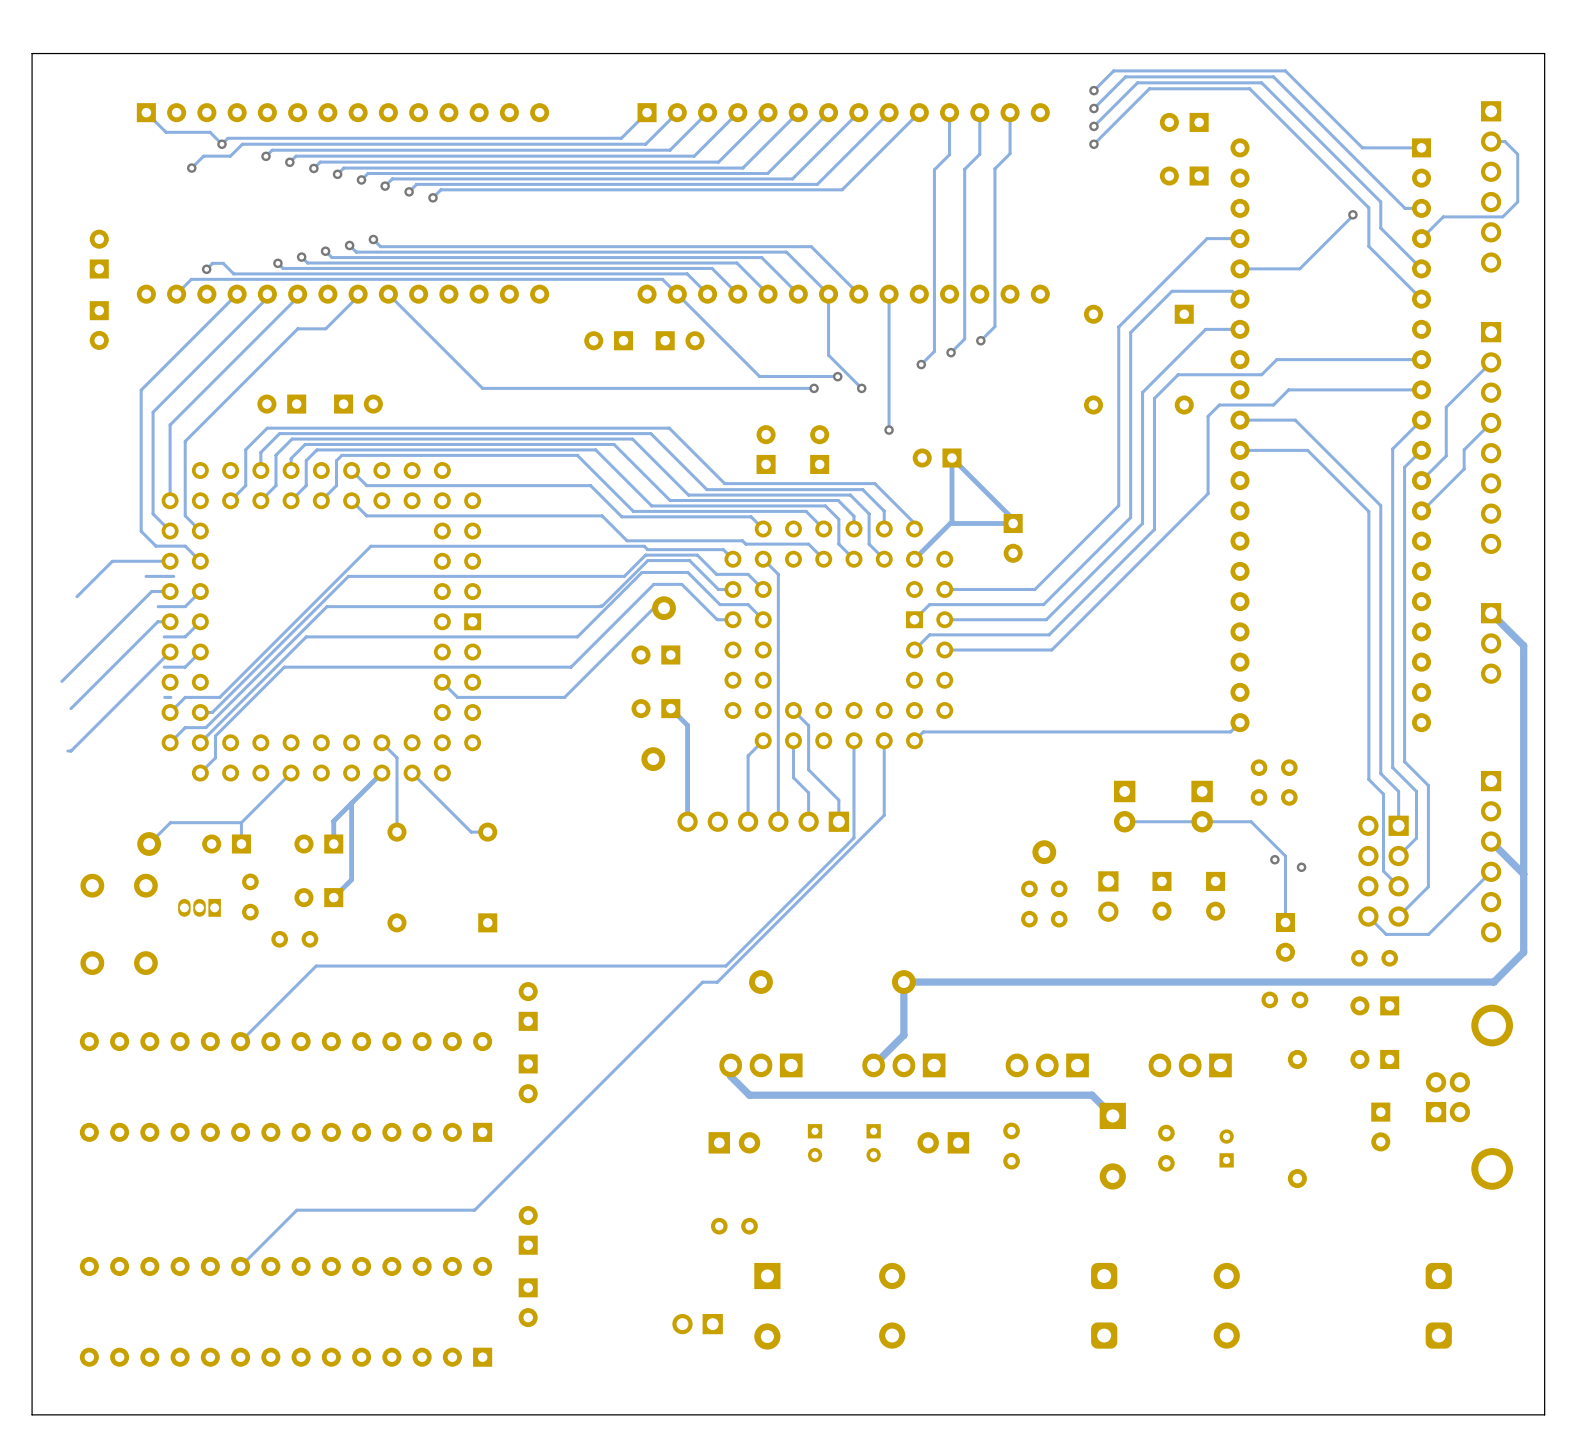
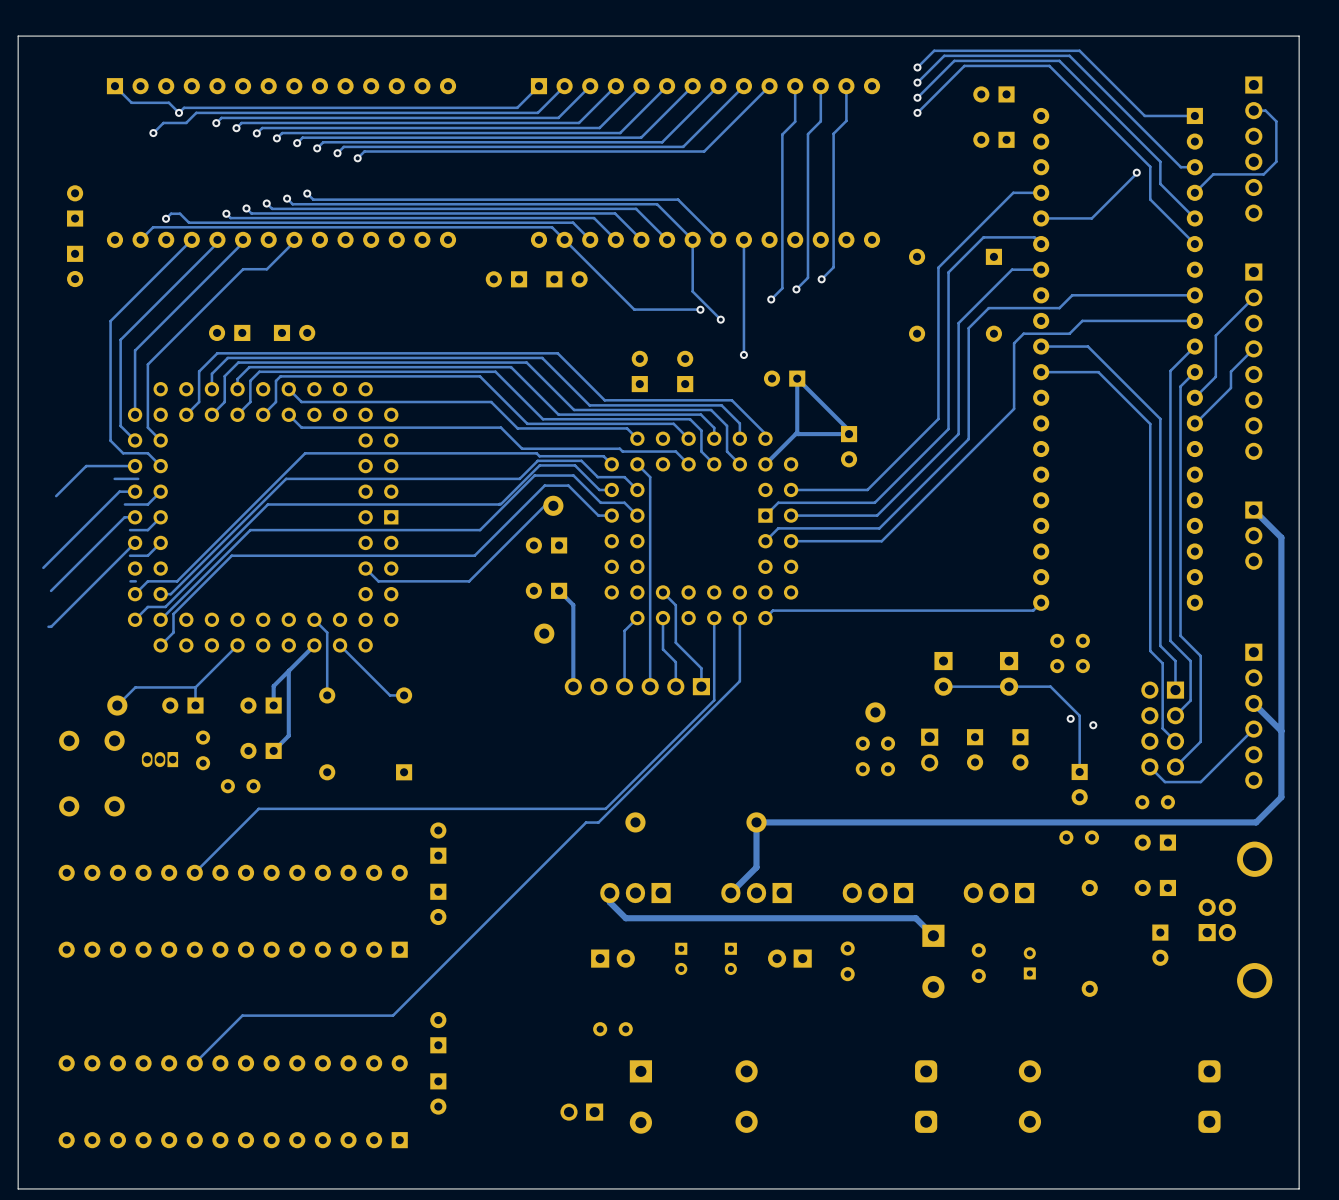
track: (388, 294) (482, 388) (814, 388) -> none
via: (814, 388) -> none

